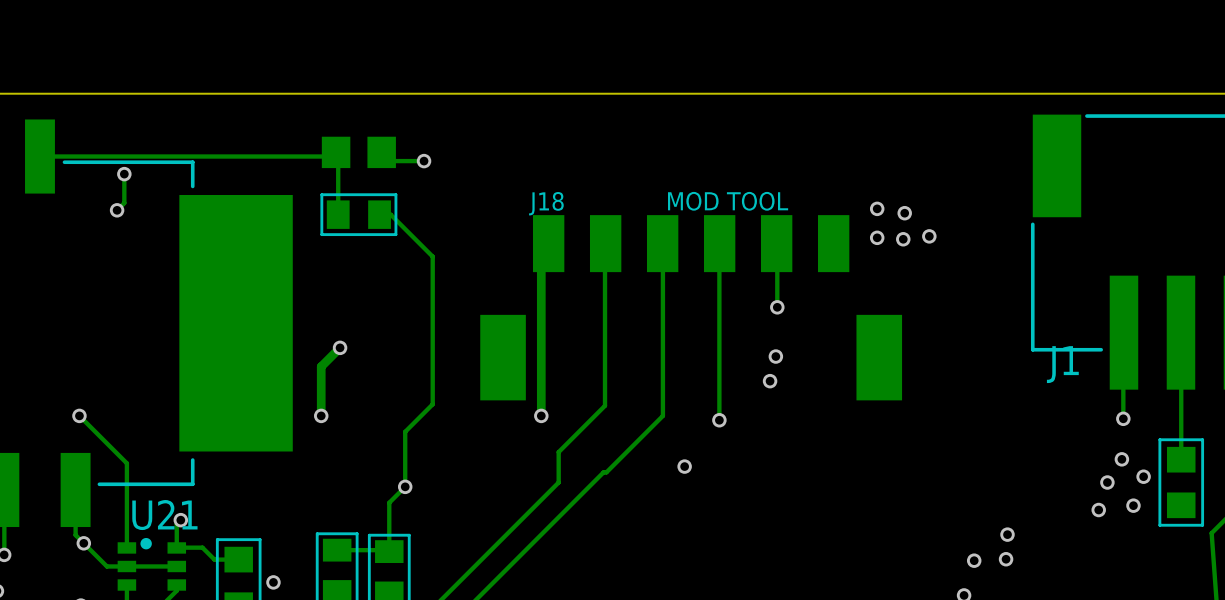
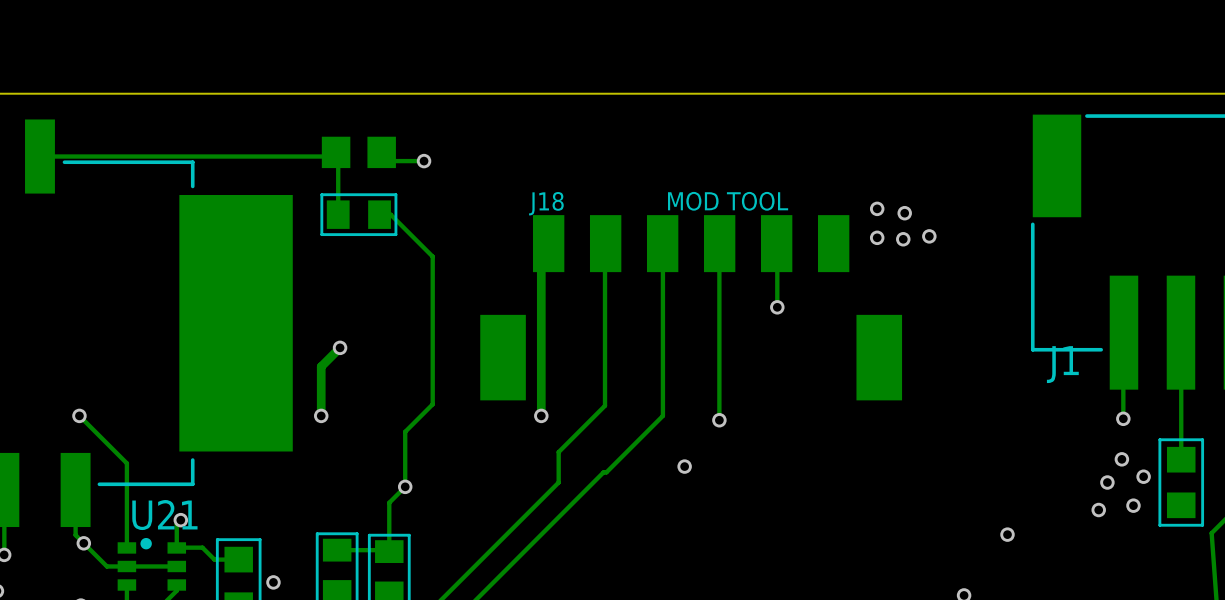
track: (124, 174) (124, 203) (117, 210) -> none
via: (124, 174) -> none
via: (117, 210) -> none
via: (775, 356) -> none
via: (770, 381) -> none
via: (1006, 559) -> none
via: (974, 560) -> none

